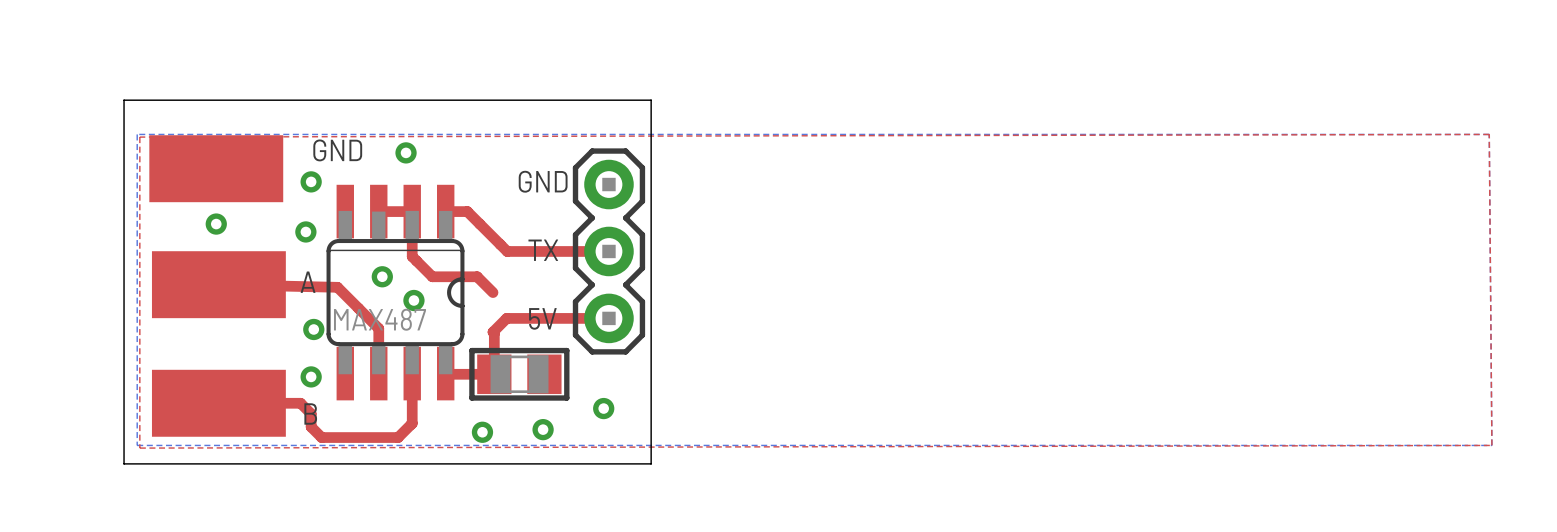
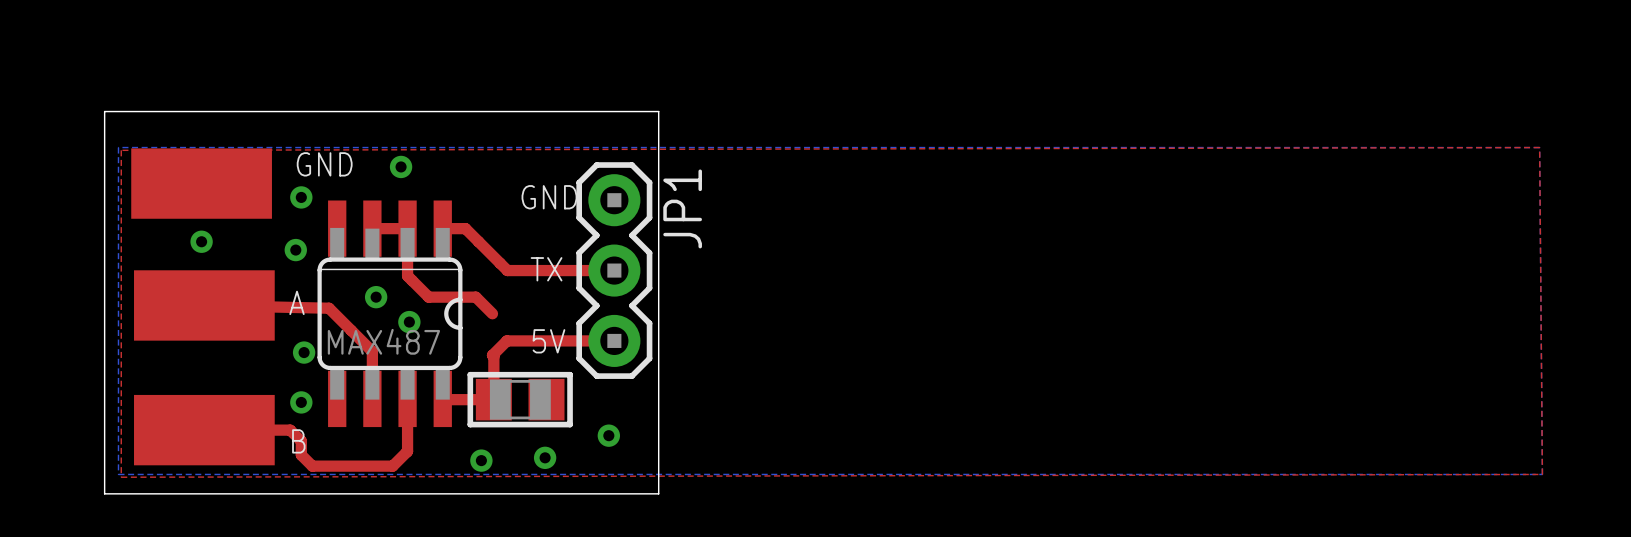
JP1 name: none -> JP1 (682, 208)

